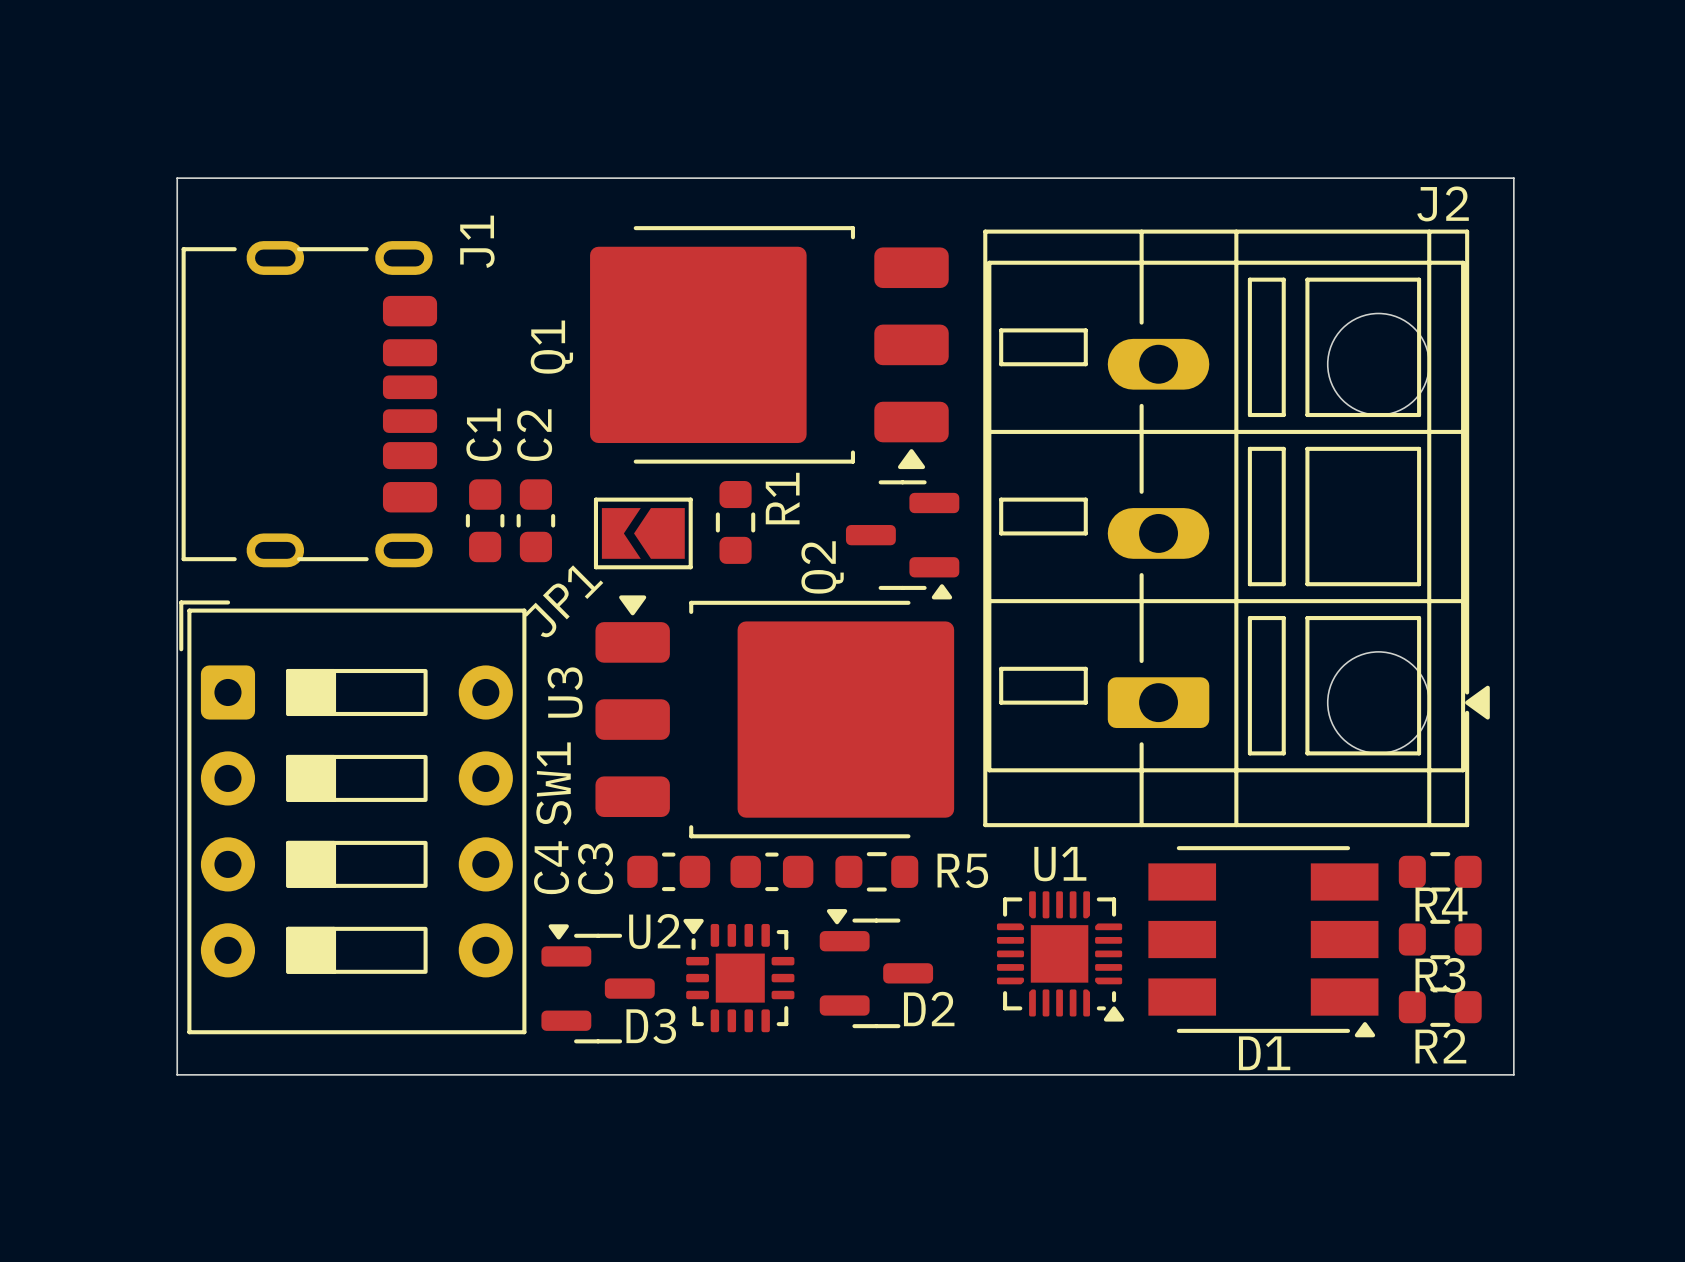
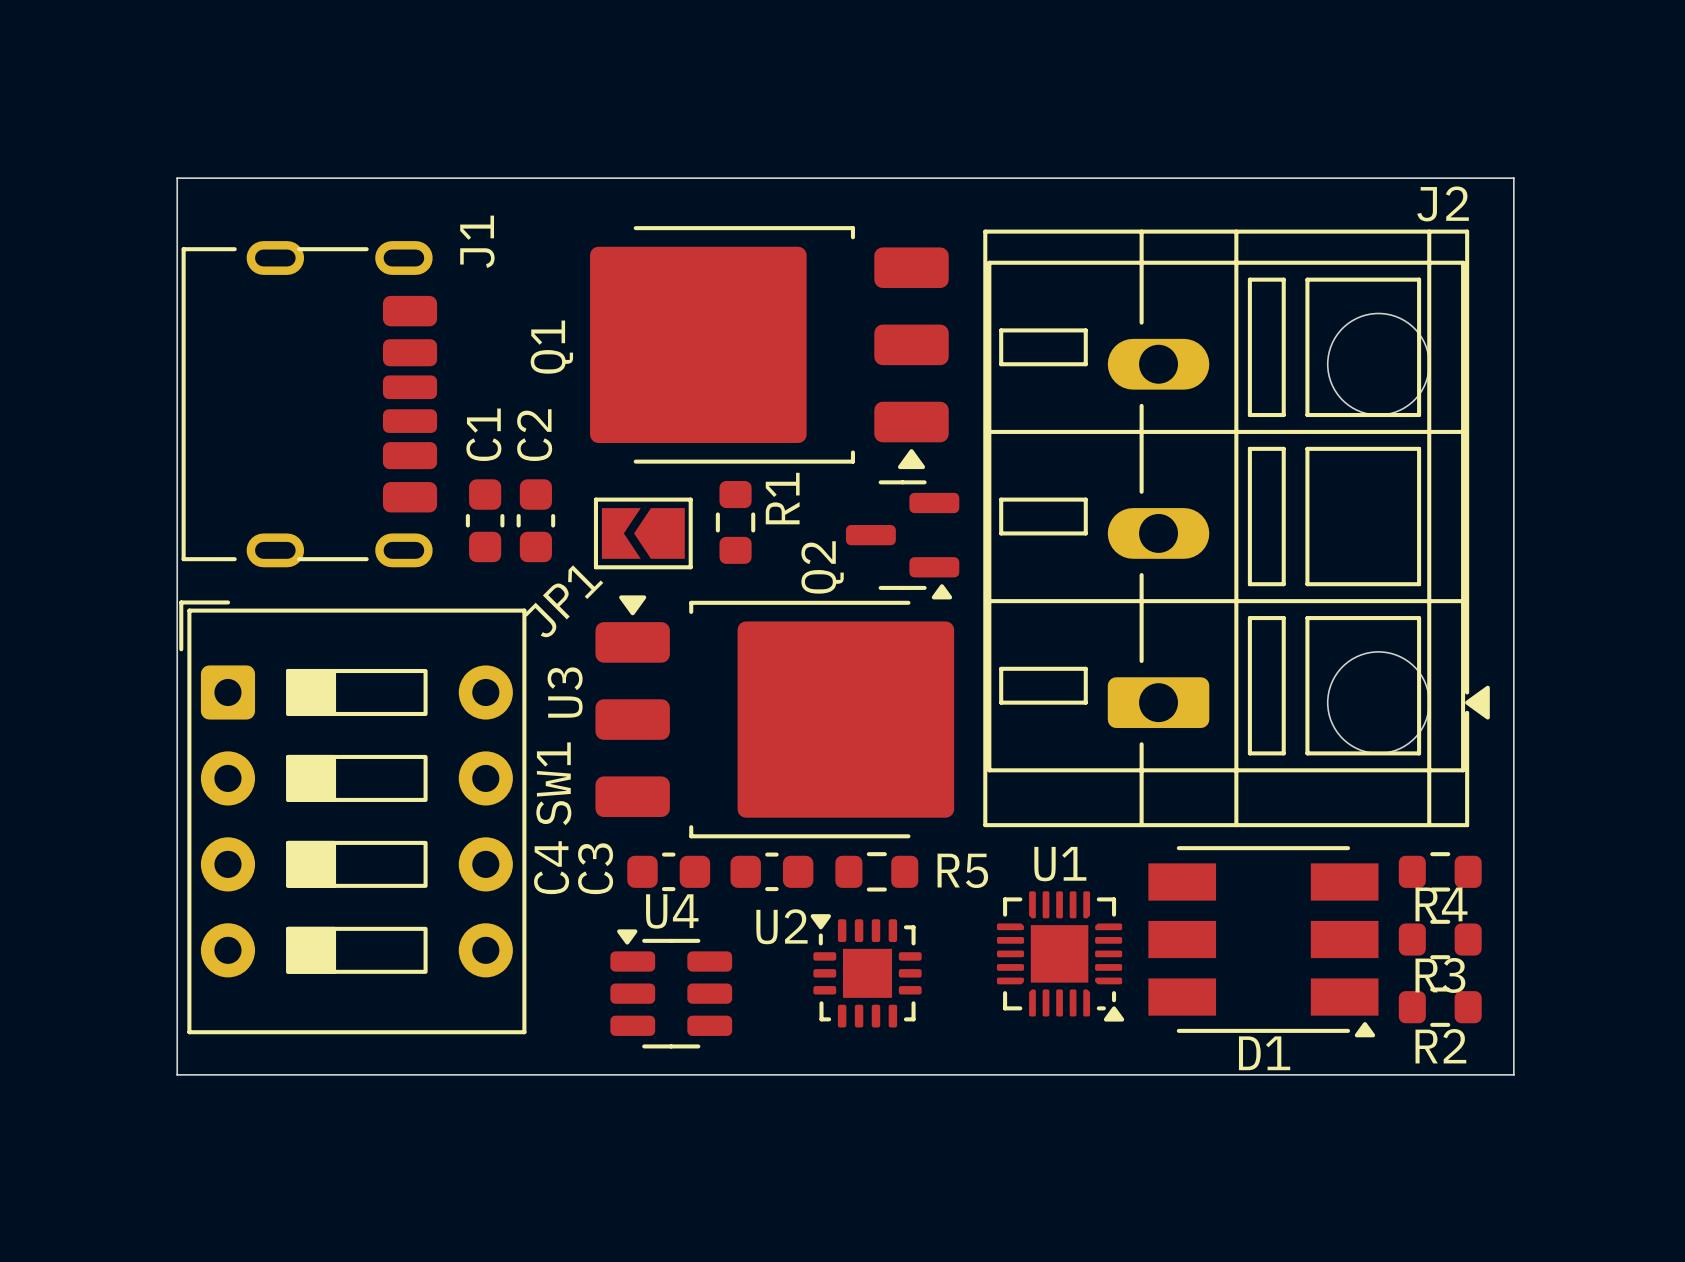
D2: (876, 968) -> none
U2 position: (738, 975) -> (866, 970)
D3: (598, 983) -> none
U4: none -> (671, 988)

